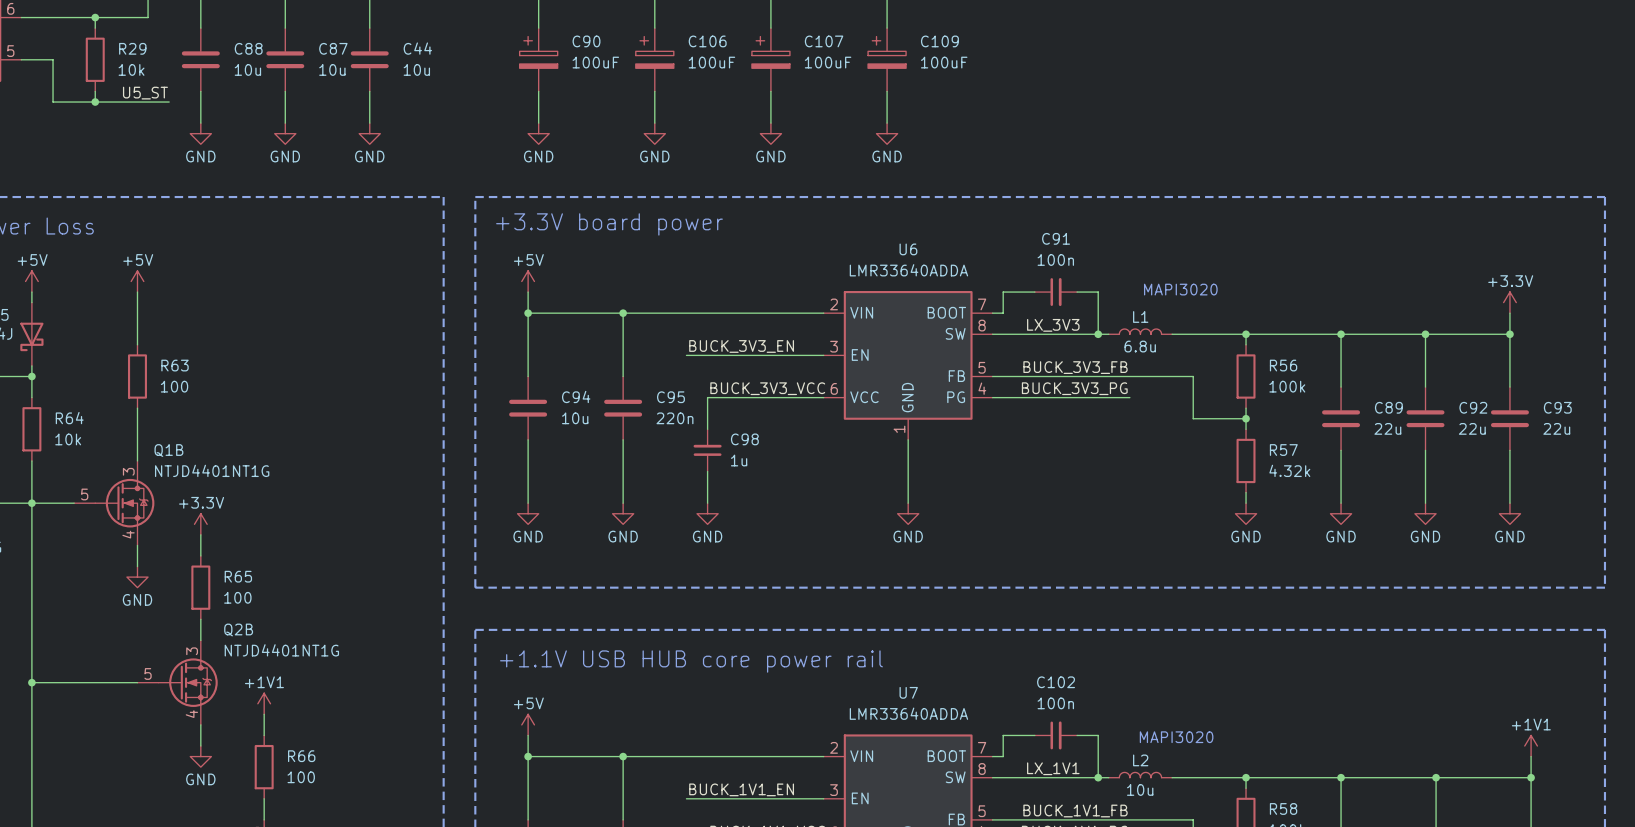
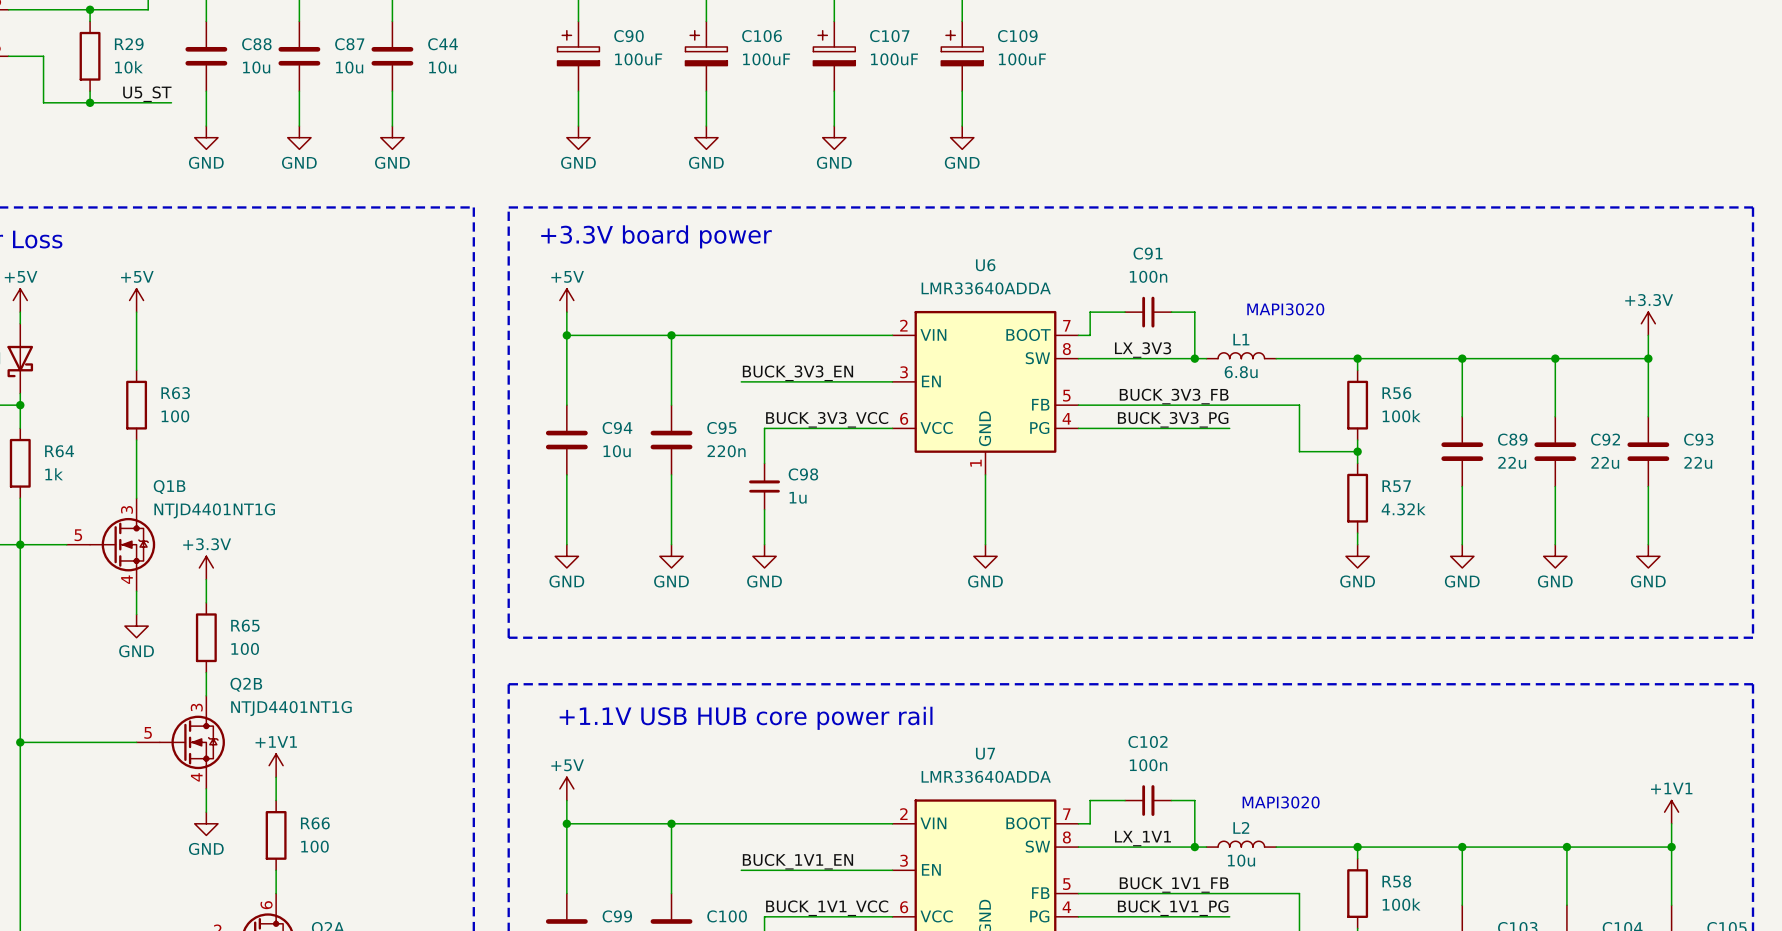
R64 value: 10k (68, 439) -> 1k (54, 474)

